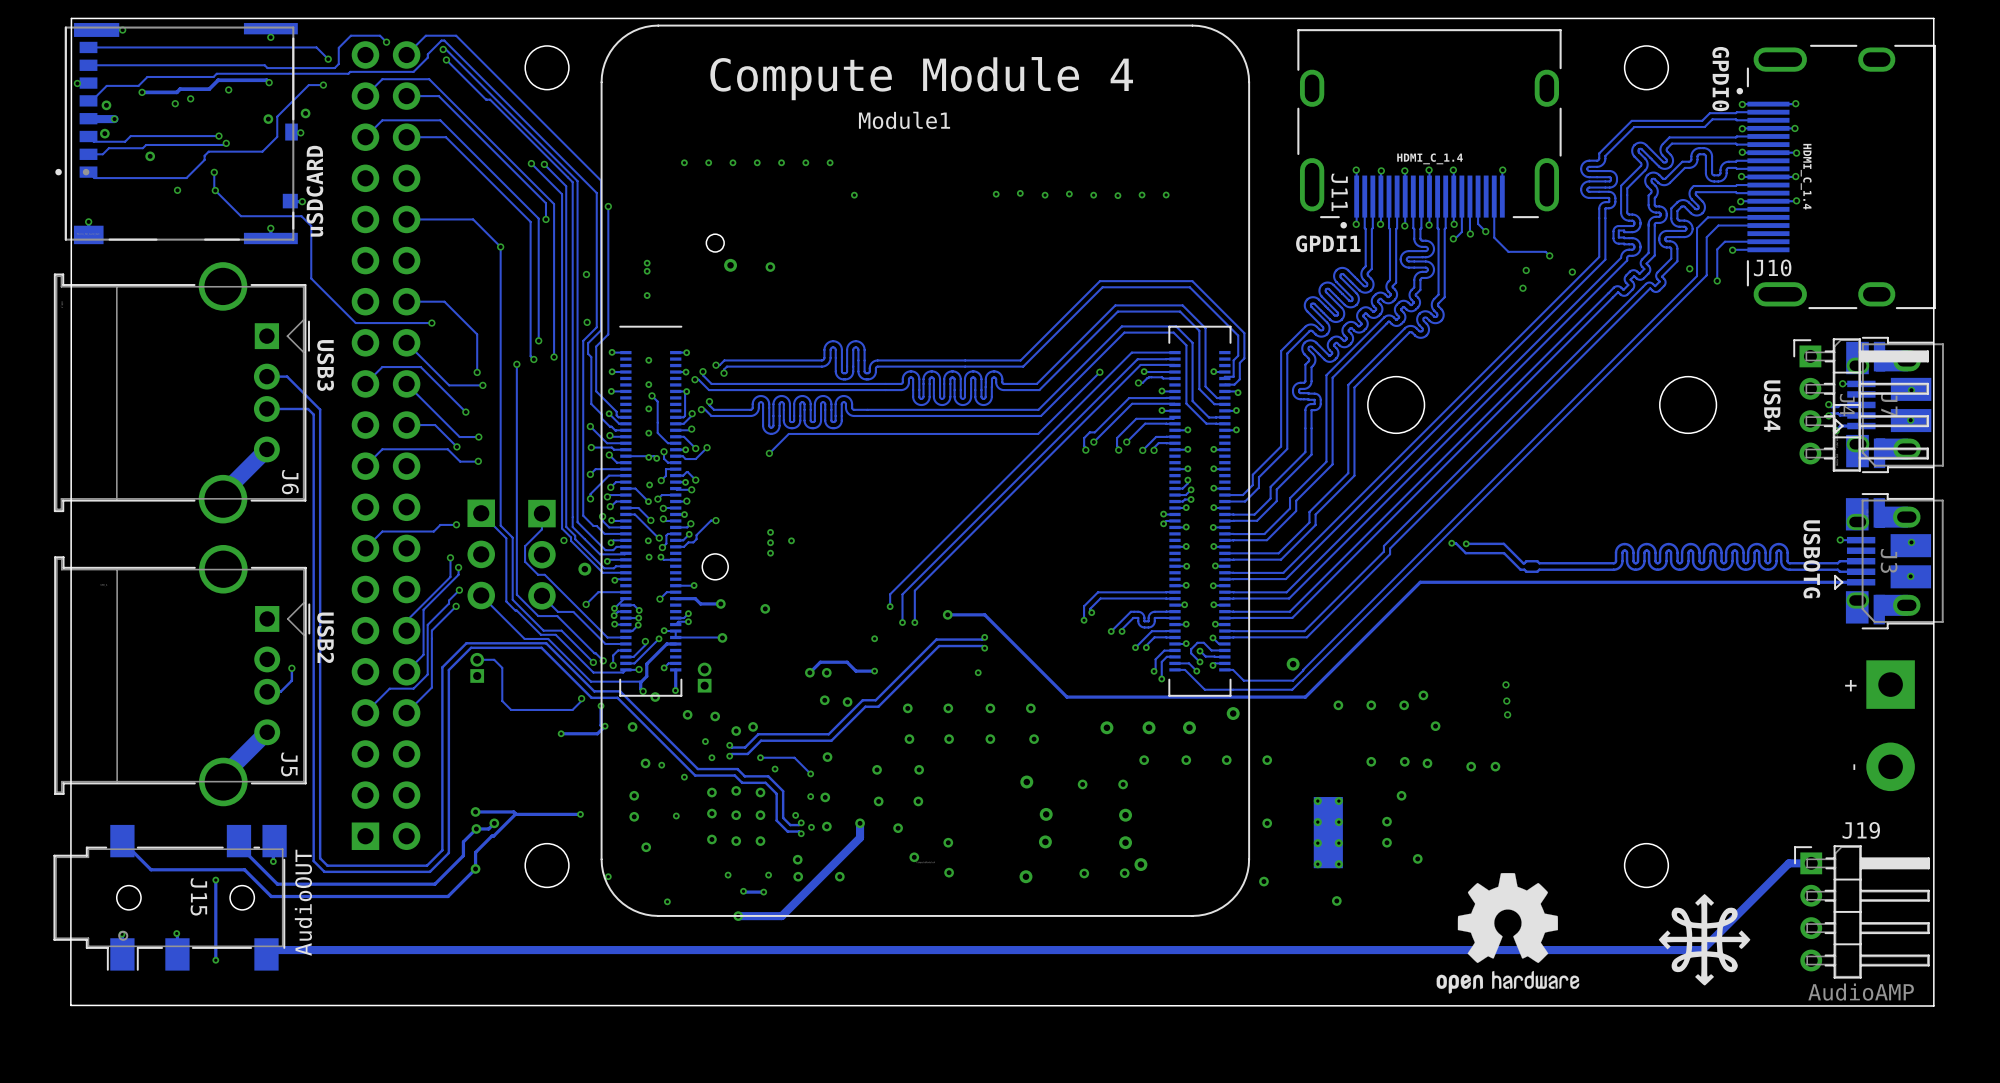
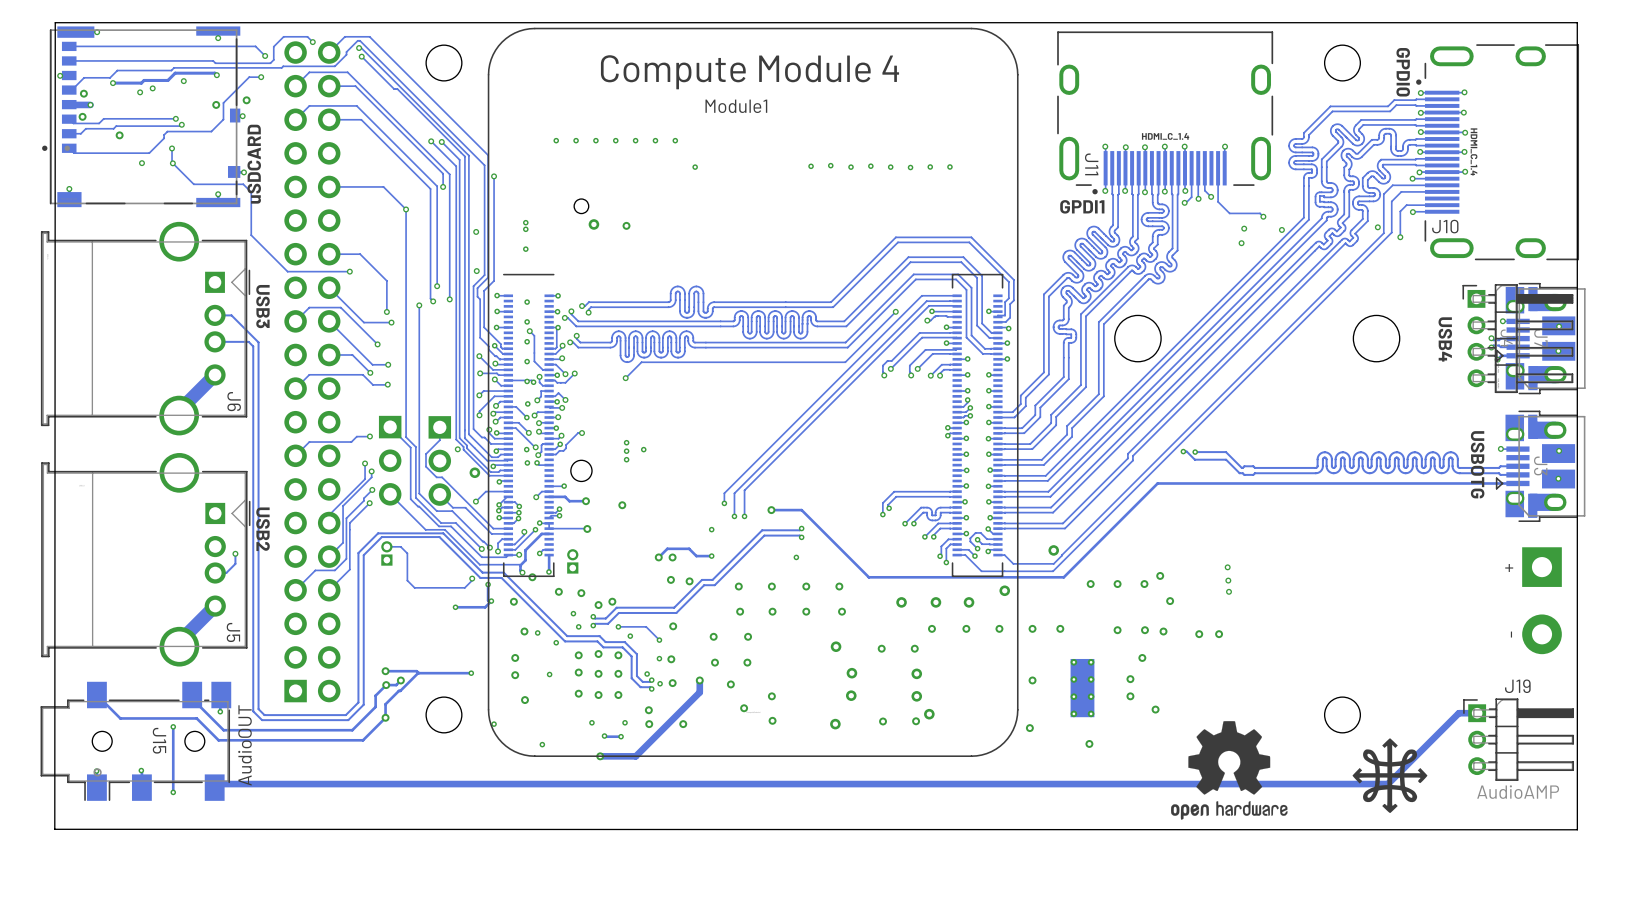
via: none -> (1060, 628)
J19 footprint: [1794, 845, 1930, 979] -> [1463, 698, 1575, 781]

